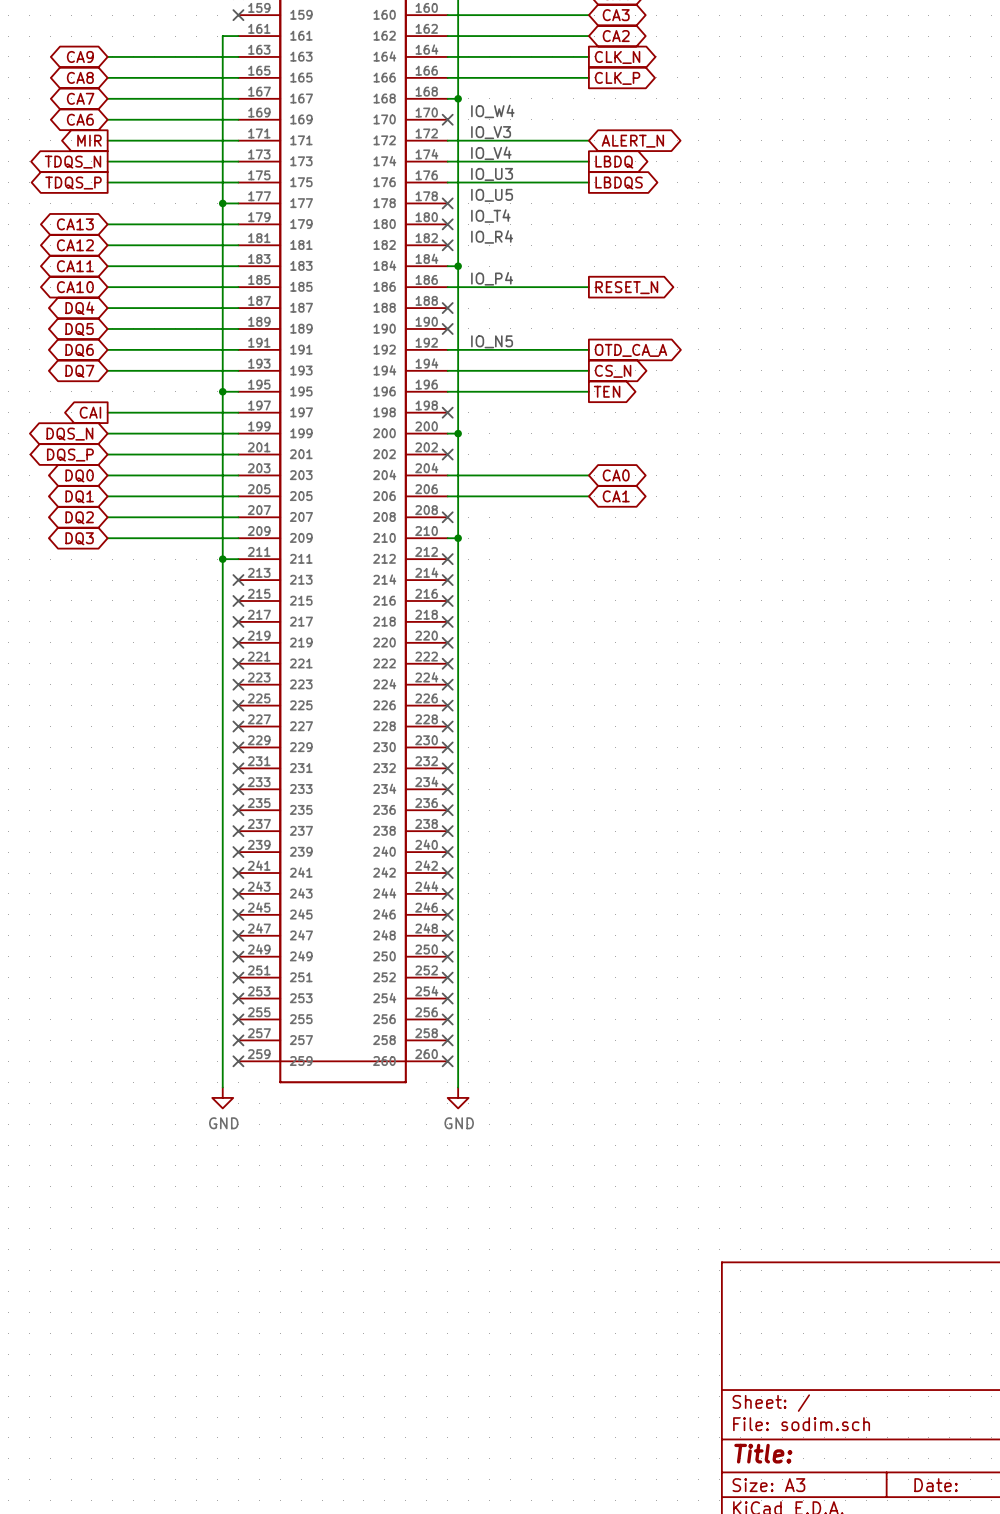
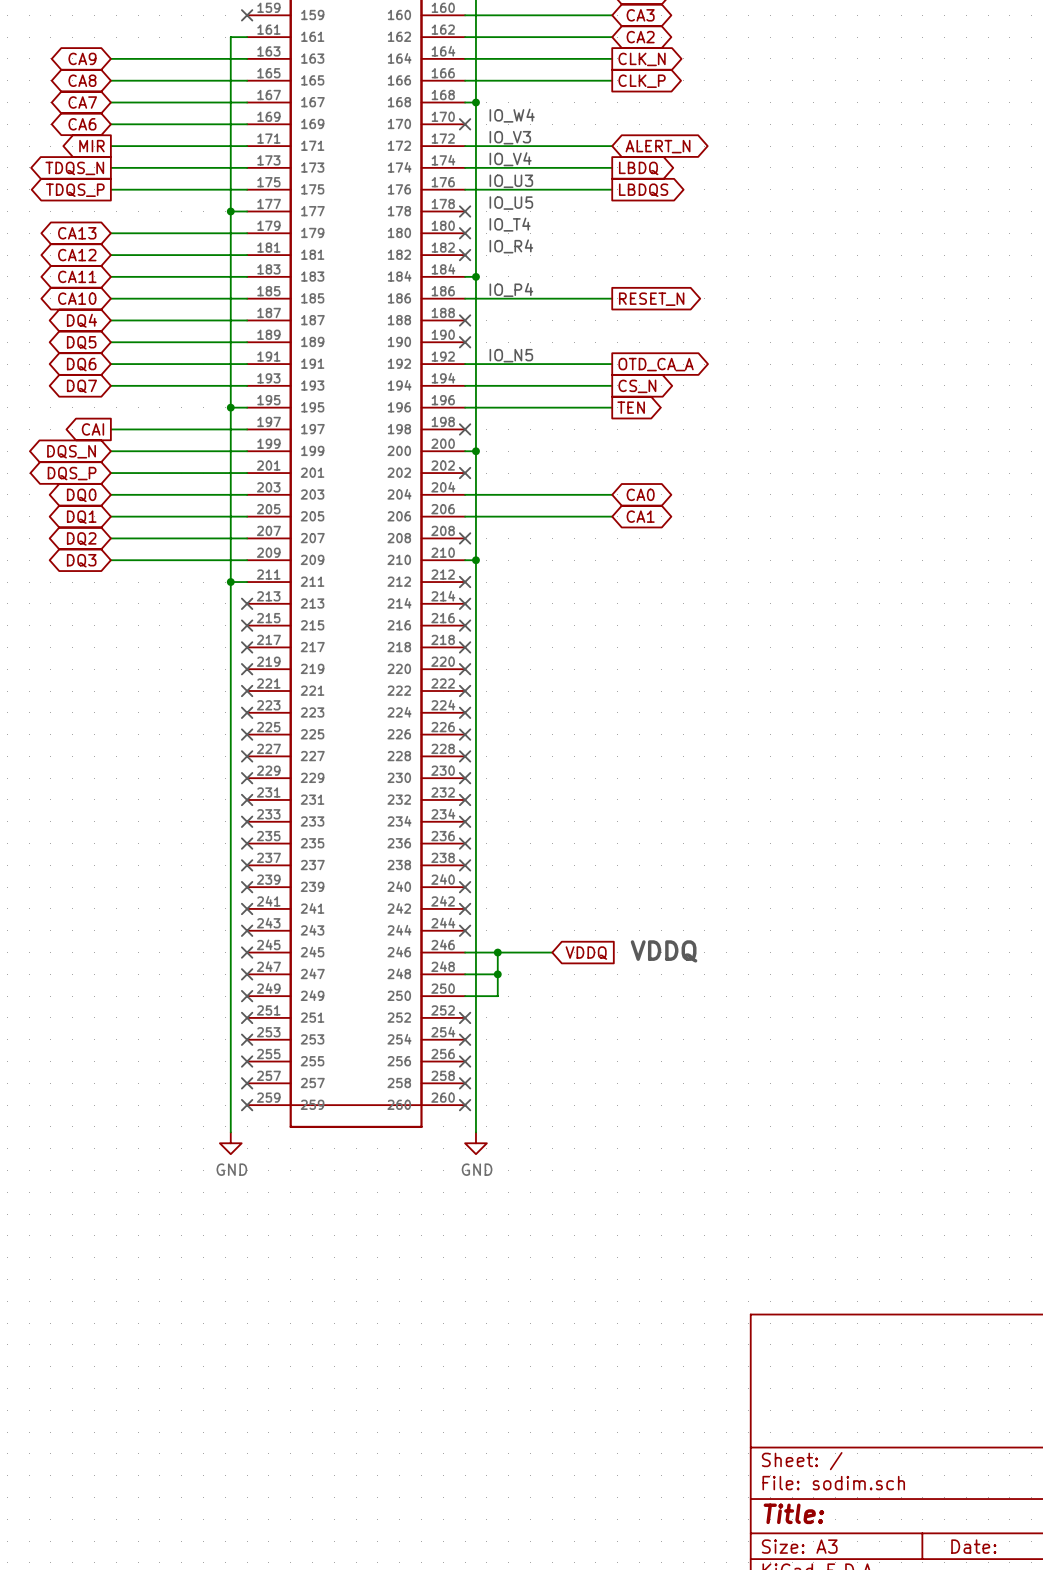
text: none -> VDDQ (664, 951)
wire: none -> (465, 952) (552, 952)
no-connect mark: (447, 914) -> none
wire: none -> (497, 952) (497, 996) (465, 996)
junction: none -> (497, 952)
global label: none -> VDDQ (586, 953)
wire: none -> (465, 974) (497, 974)
no-connect mark: (447, 935) -> none
junction: none -> (497, 974)
no-connect mark: (447, 956) -> none

